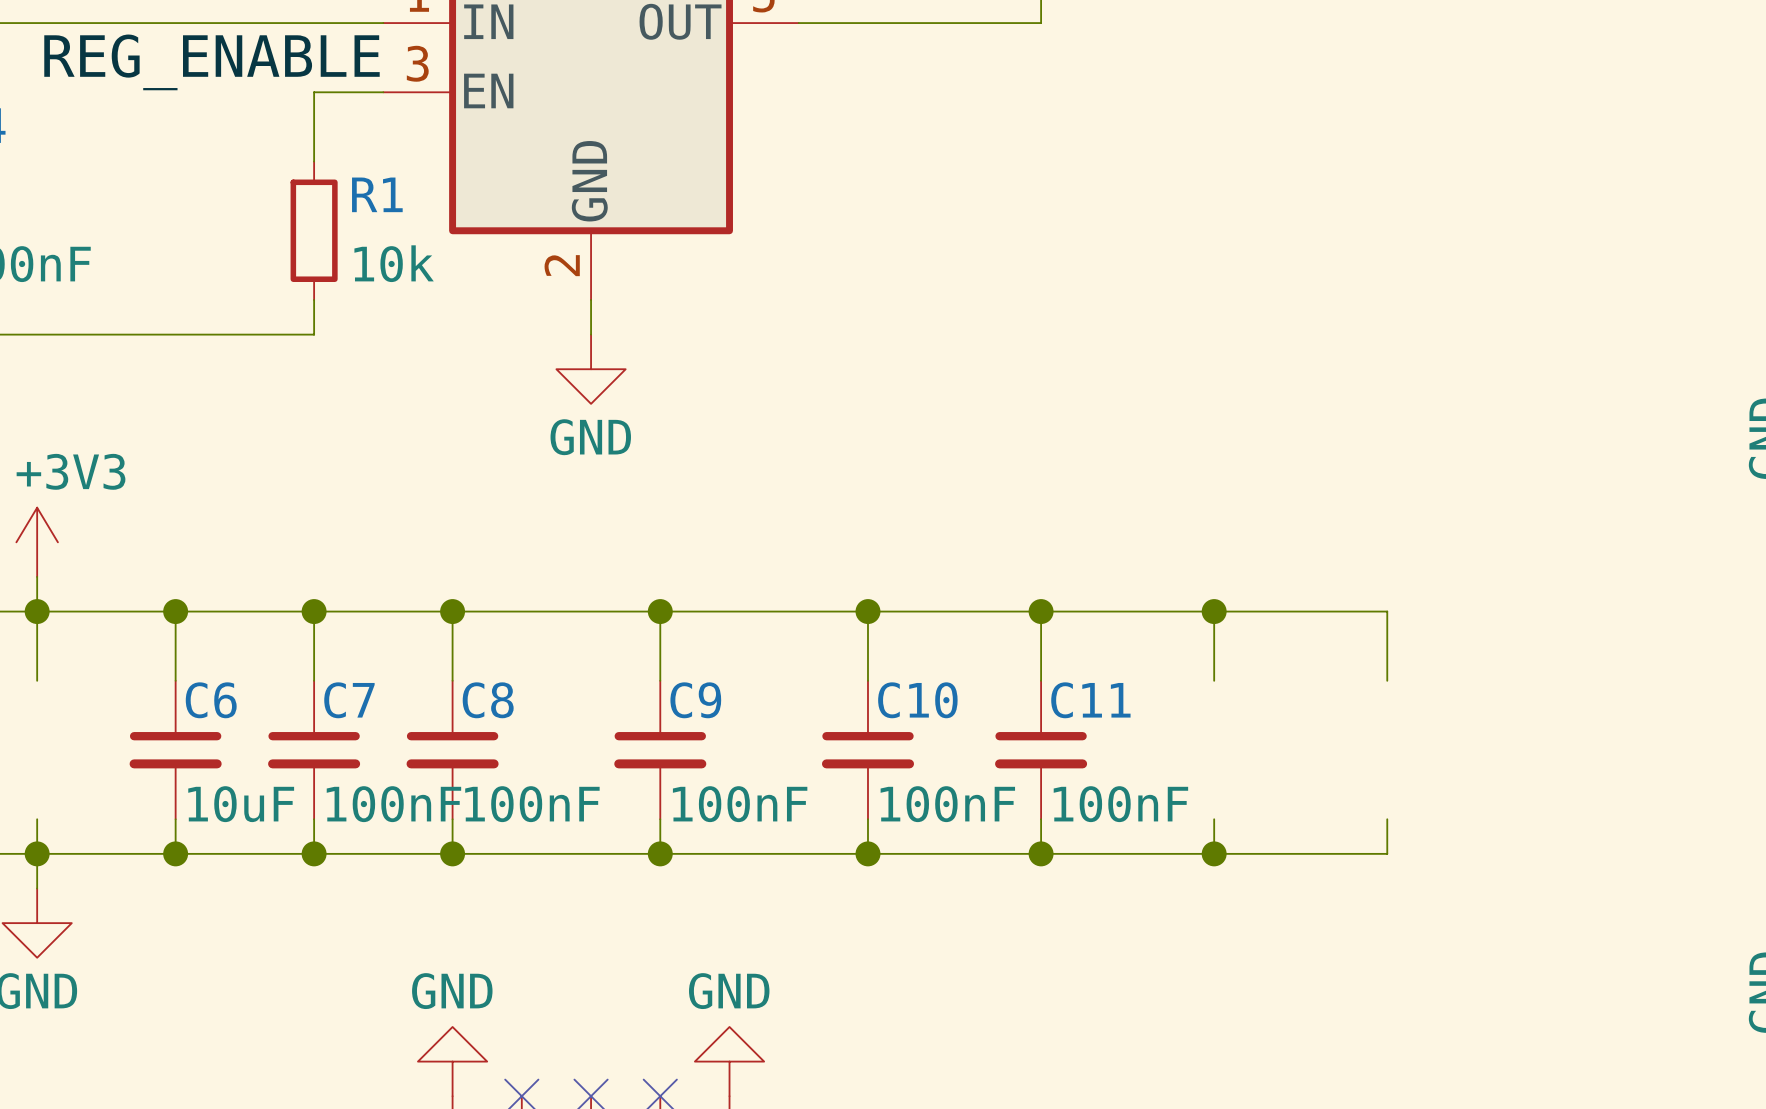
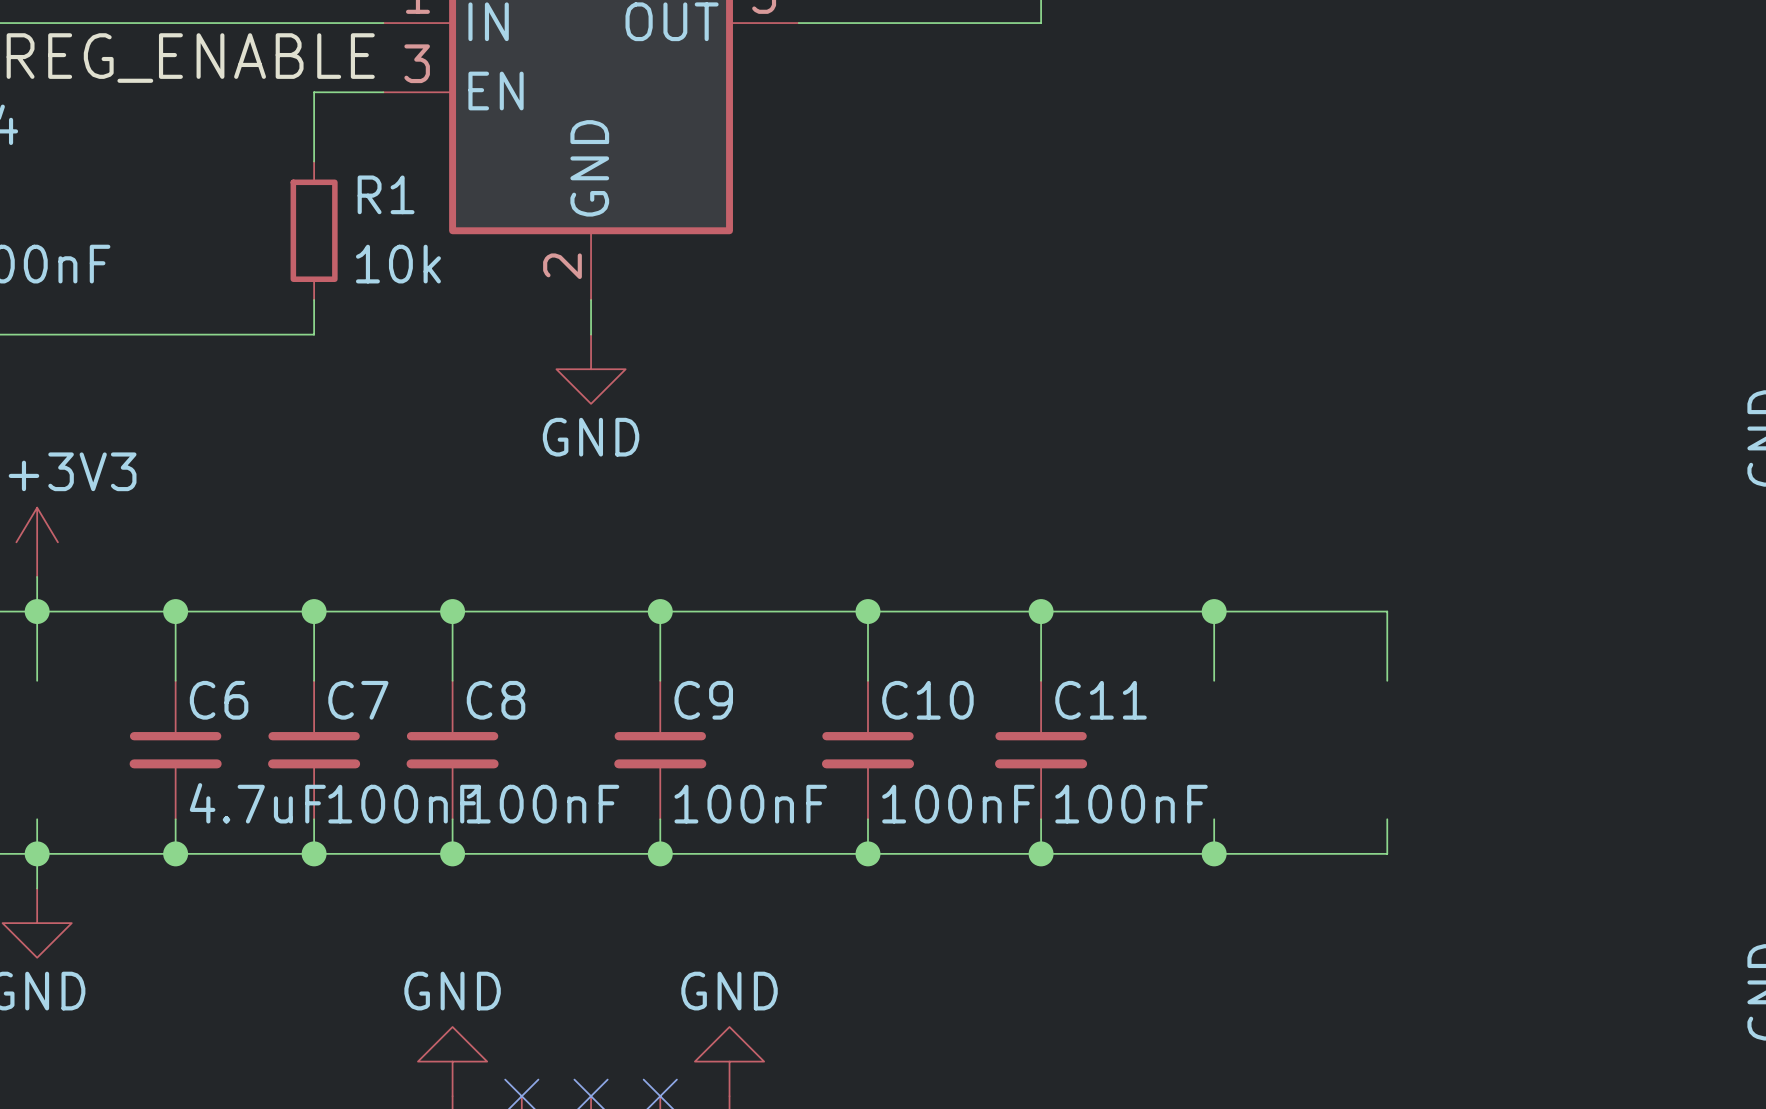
C6 value: 10uF (241, 804) -> 4.7uF (257, 803)

